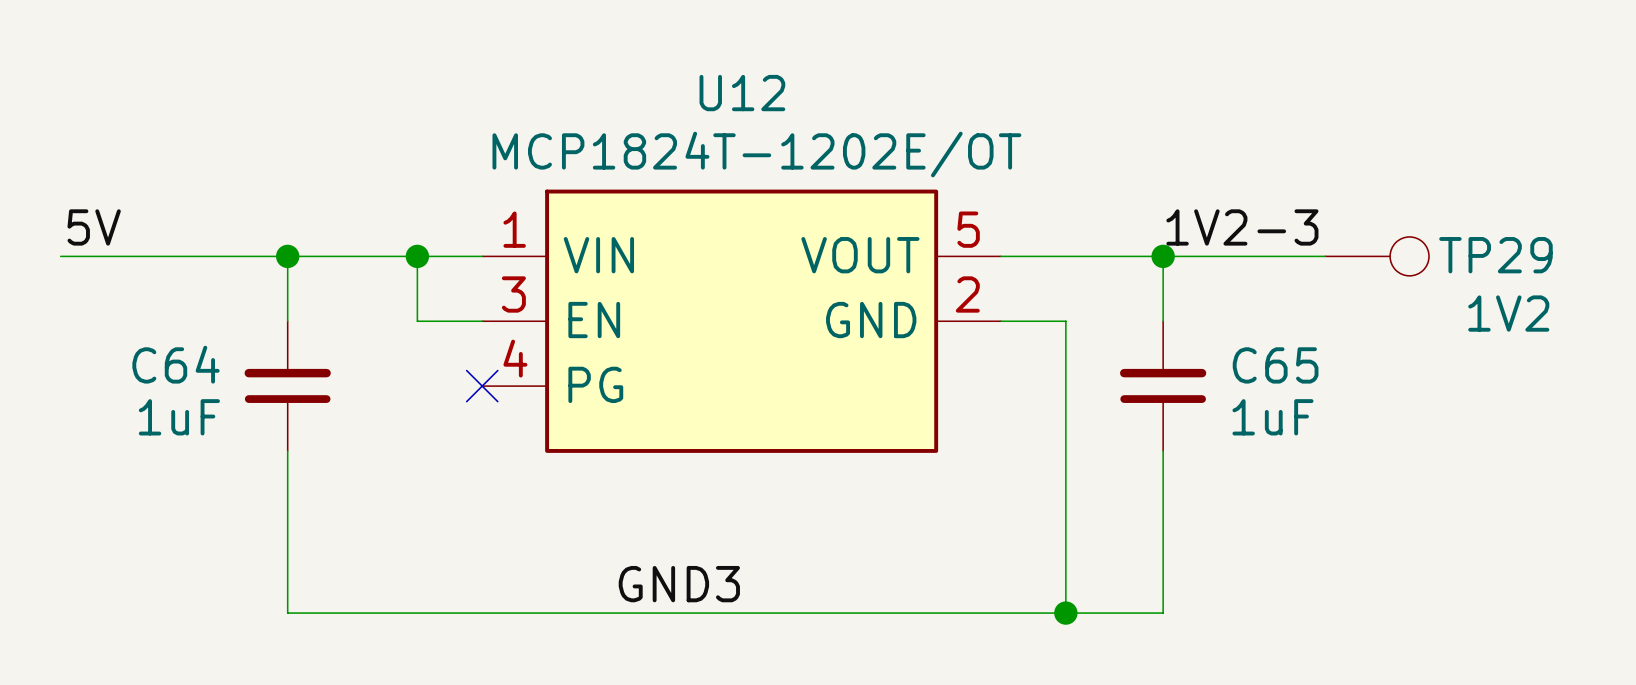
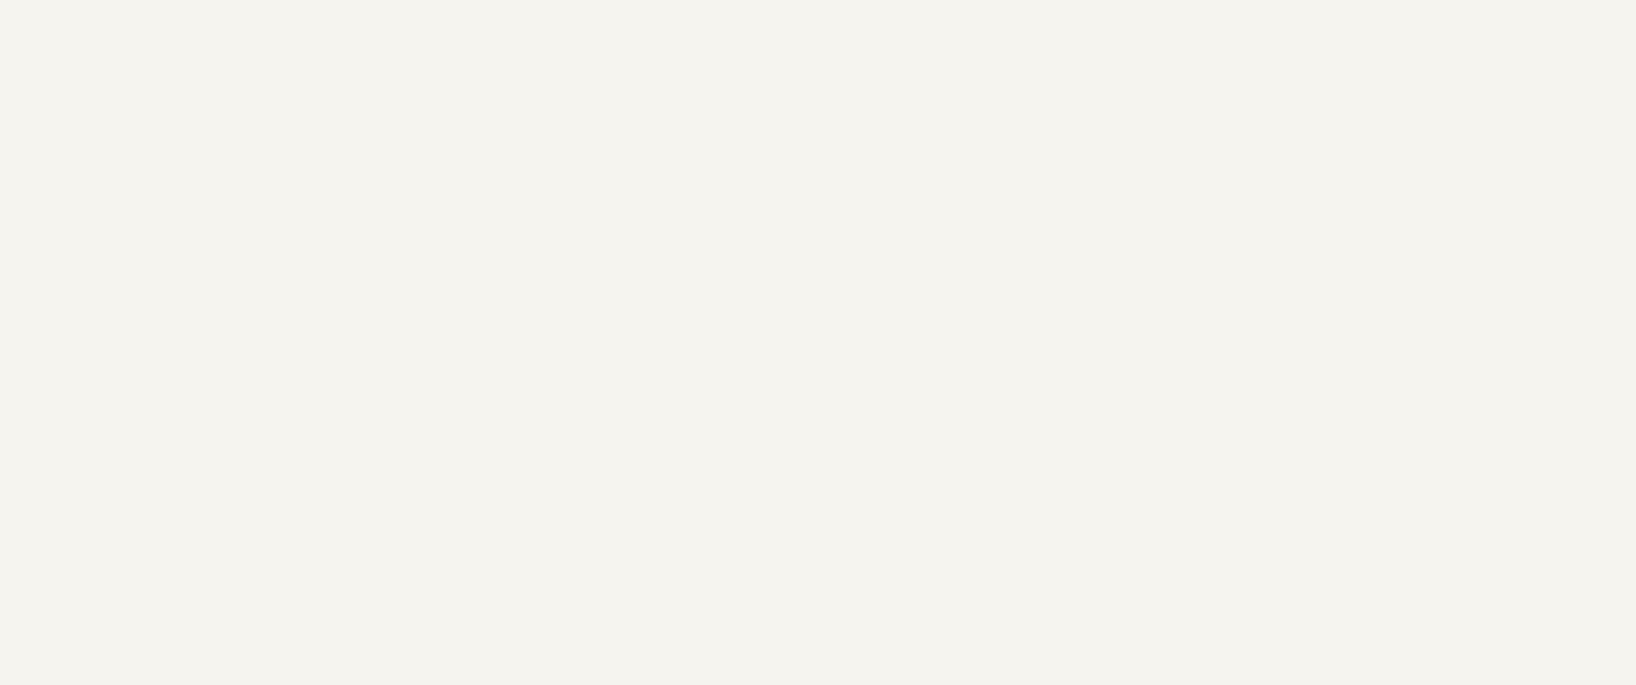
label: 5V (94, 227) -> none
label: 1V2-3 (1242, 227) -> none
wire: (60, 256) (482, 256) -> none
wire: (287, 256) (287, 321) -> none
junction: (287, 256) -> none
wire: (417, 256) (417, 321) (482, 321) -> none
junction: (417, 256) -> none
wire: (1001, 256) (1325, 256) -> none
wire: (1163, 256) (1163, 321) -> none
junction: (1163, 256) -> none
TP29: 1V2 (1377, 256) -> none
U12: MCP1824T-1202E/OT (741, 321) -> none
wire: (1001, 321) (1065, 321) (1065, 613) -> none
C64: 1uF (287, 386) -> none
no-connect mark: (482, 386) -> none
C65: 1uF (1163, 386) -> none
wire: (287, 450) (287, 613) (1163, 613) (1163, 450) -> none
label: GND3 (679, 584) -> none
junction: (1065, 613) -> none

